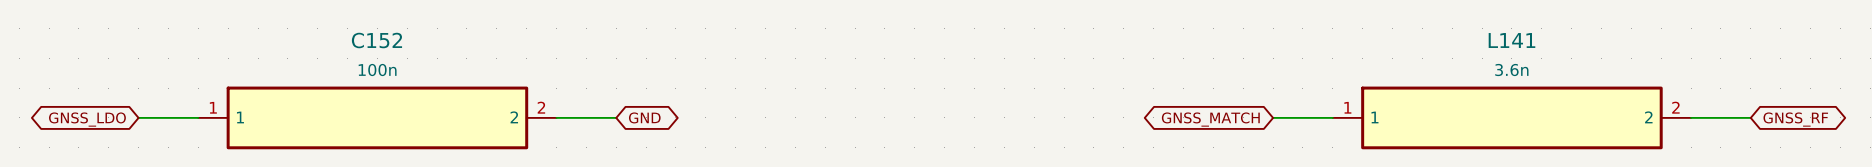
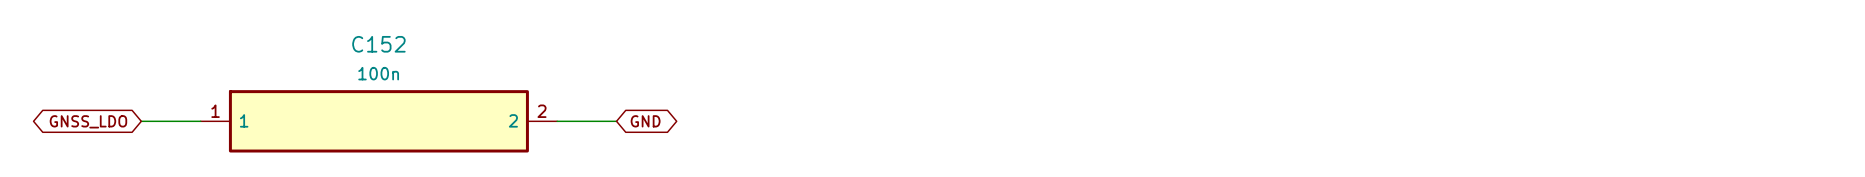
wire: (1273, 117) (1332, 117) -> none
L141: 3.6n (1511, 117) -> none
wire: (1691, 117) (1750, 117) -> none
global label: GNSS_MATCH (1210, 119) -> none
global label: GNSS_RF (1795, 119) -> none

